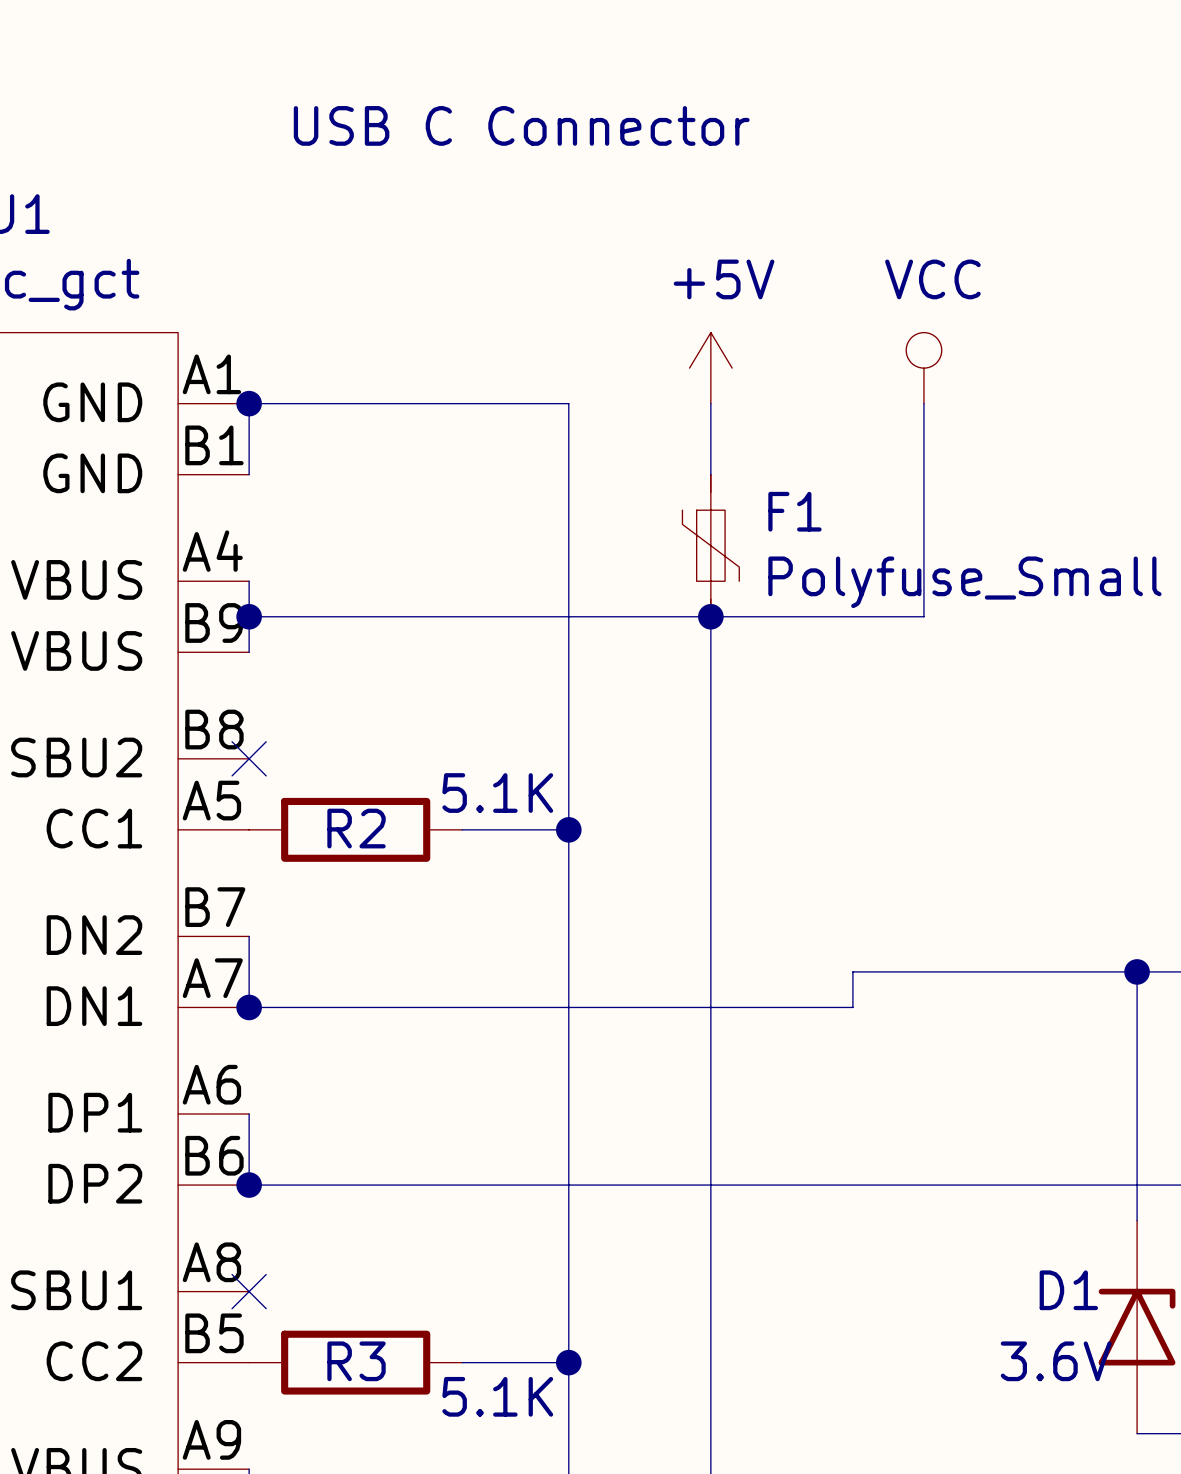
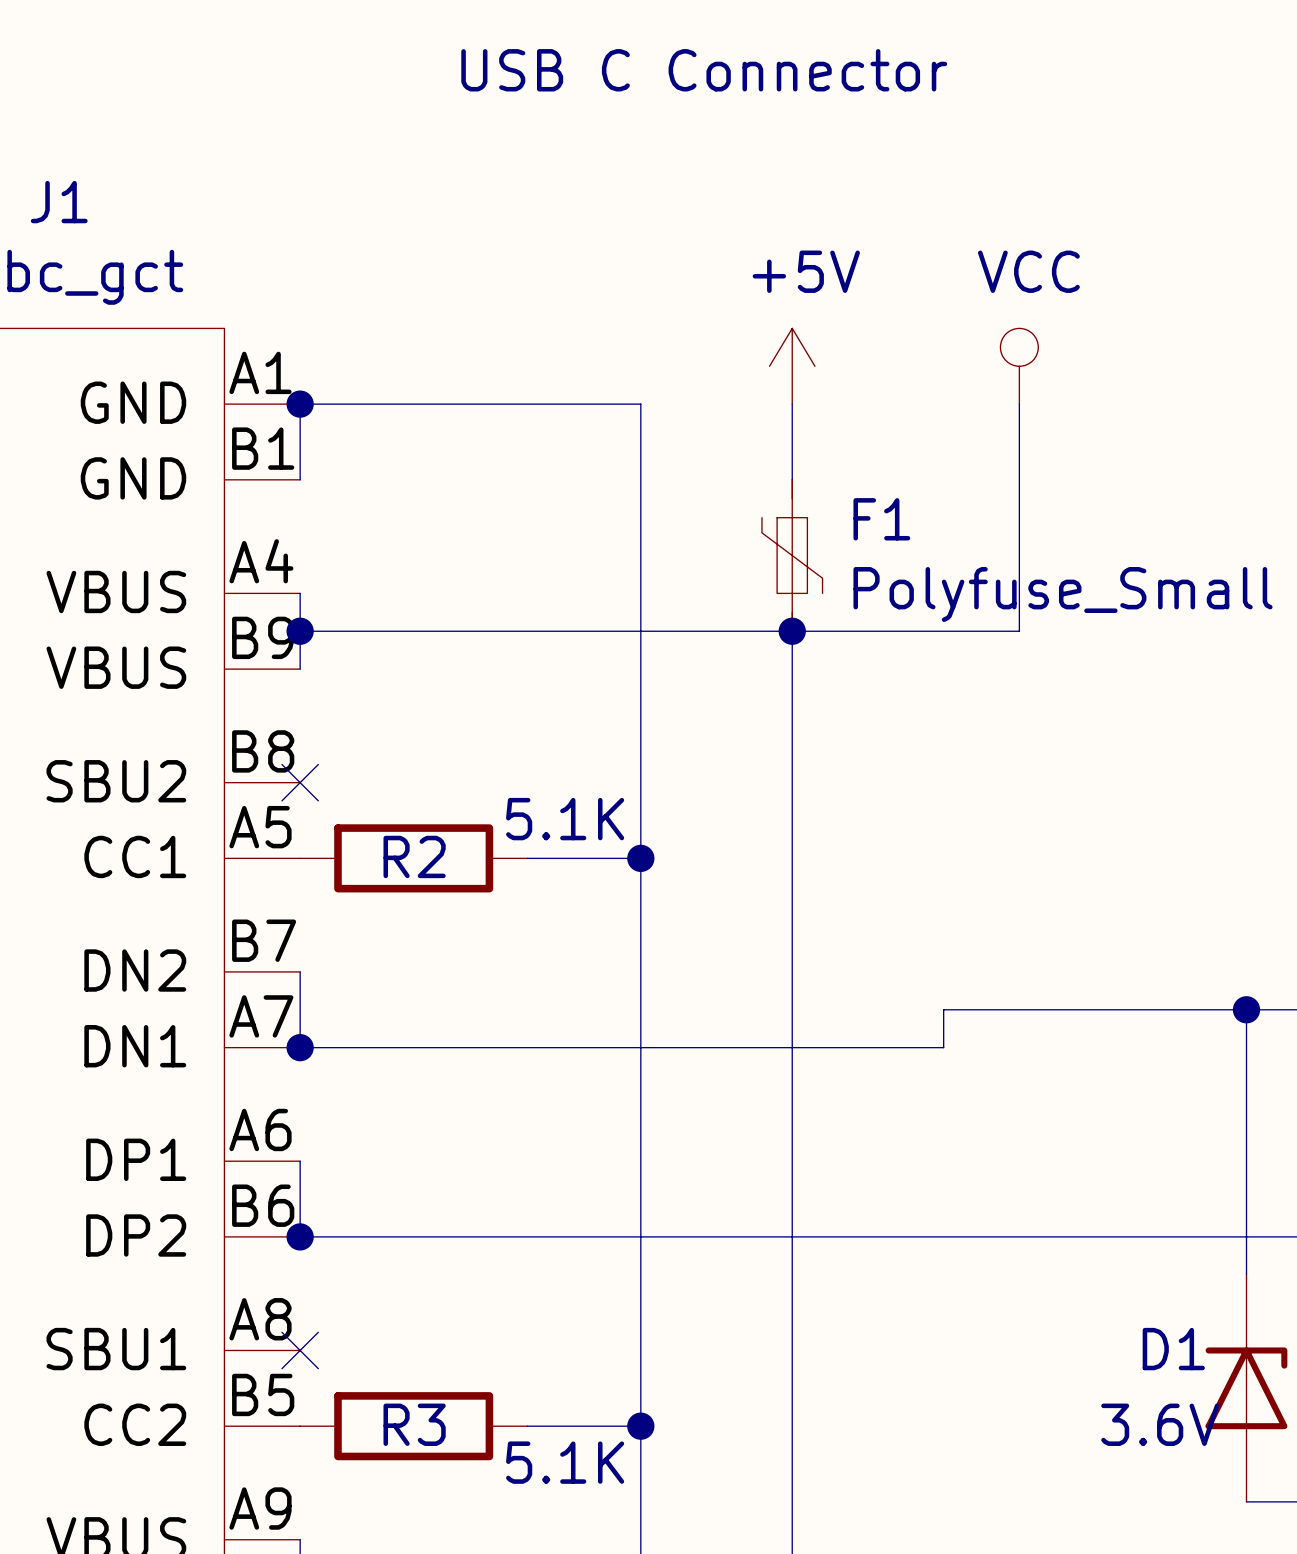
text position: USB C Connector (521, 125) -> USB C Connector (704, 70)

